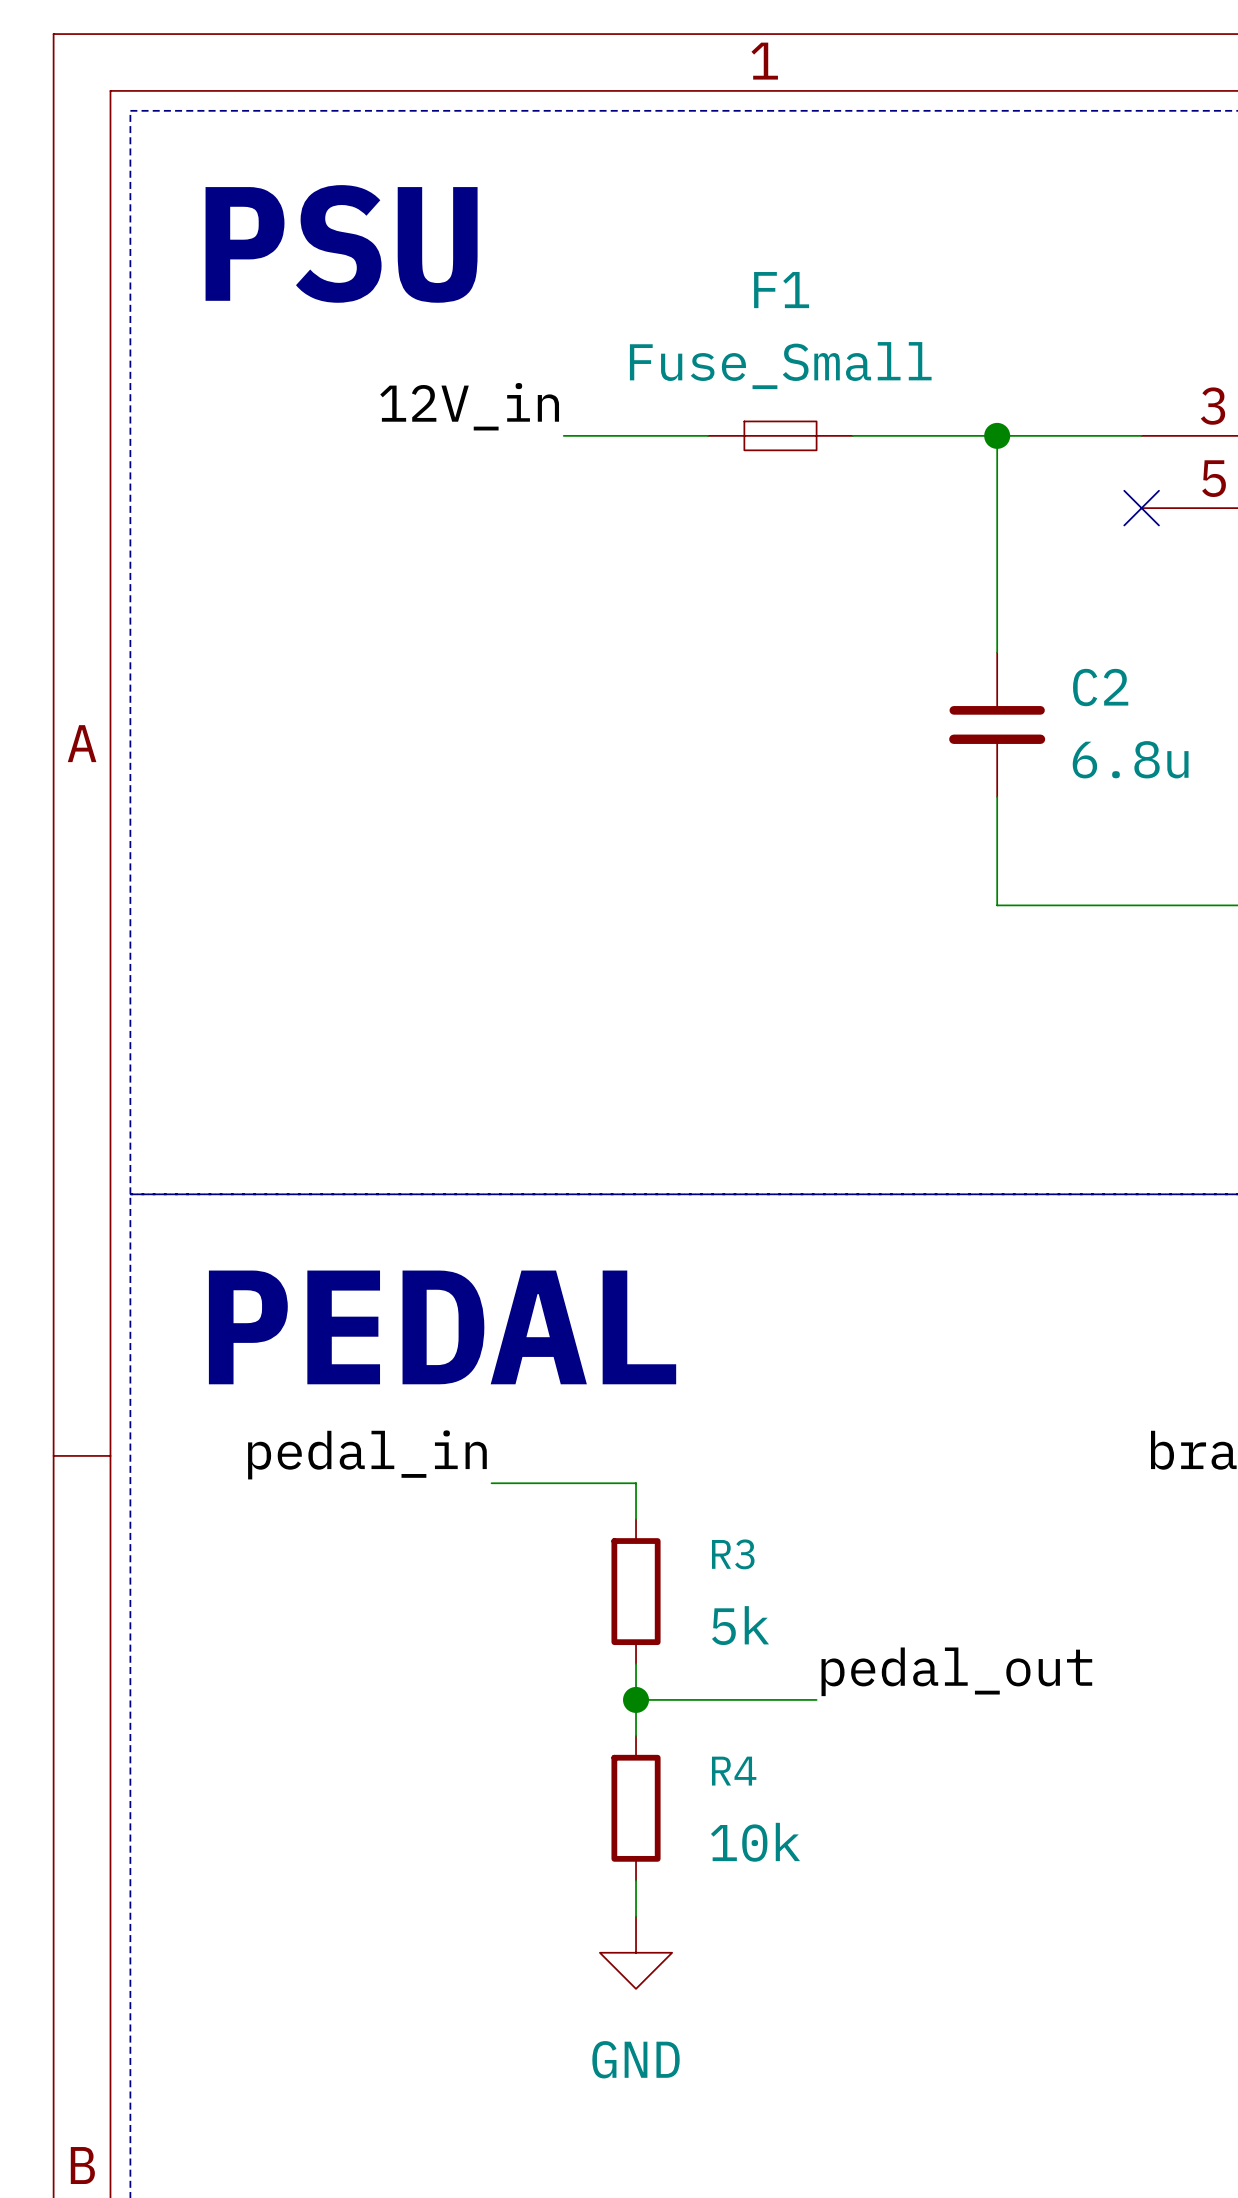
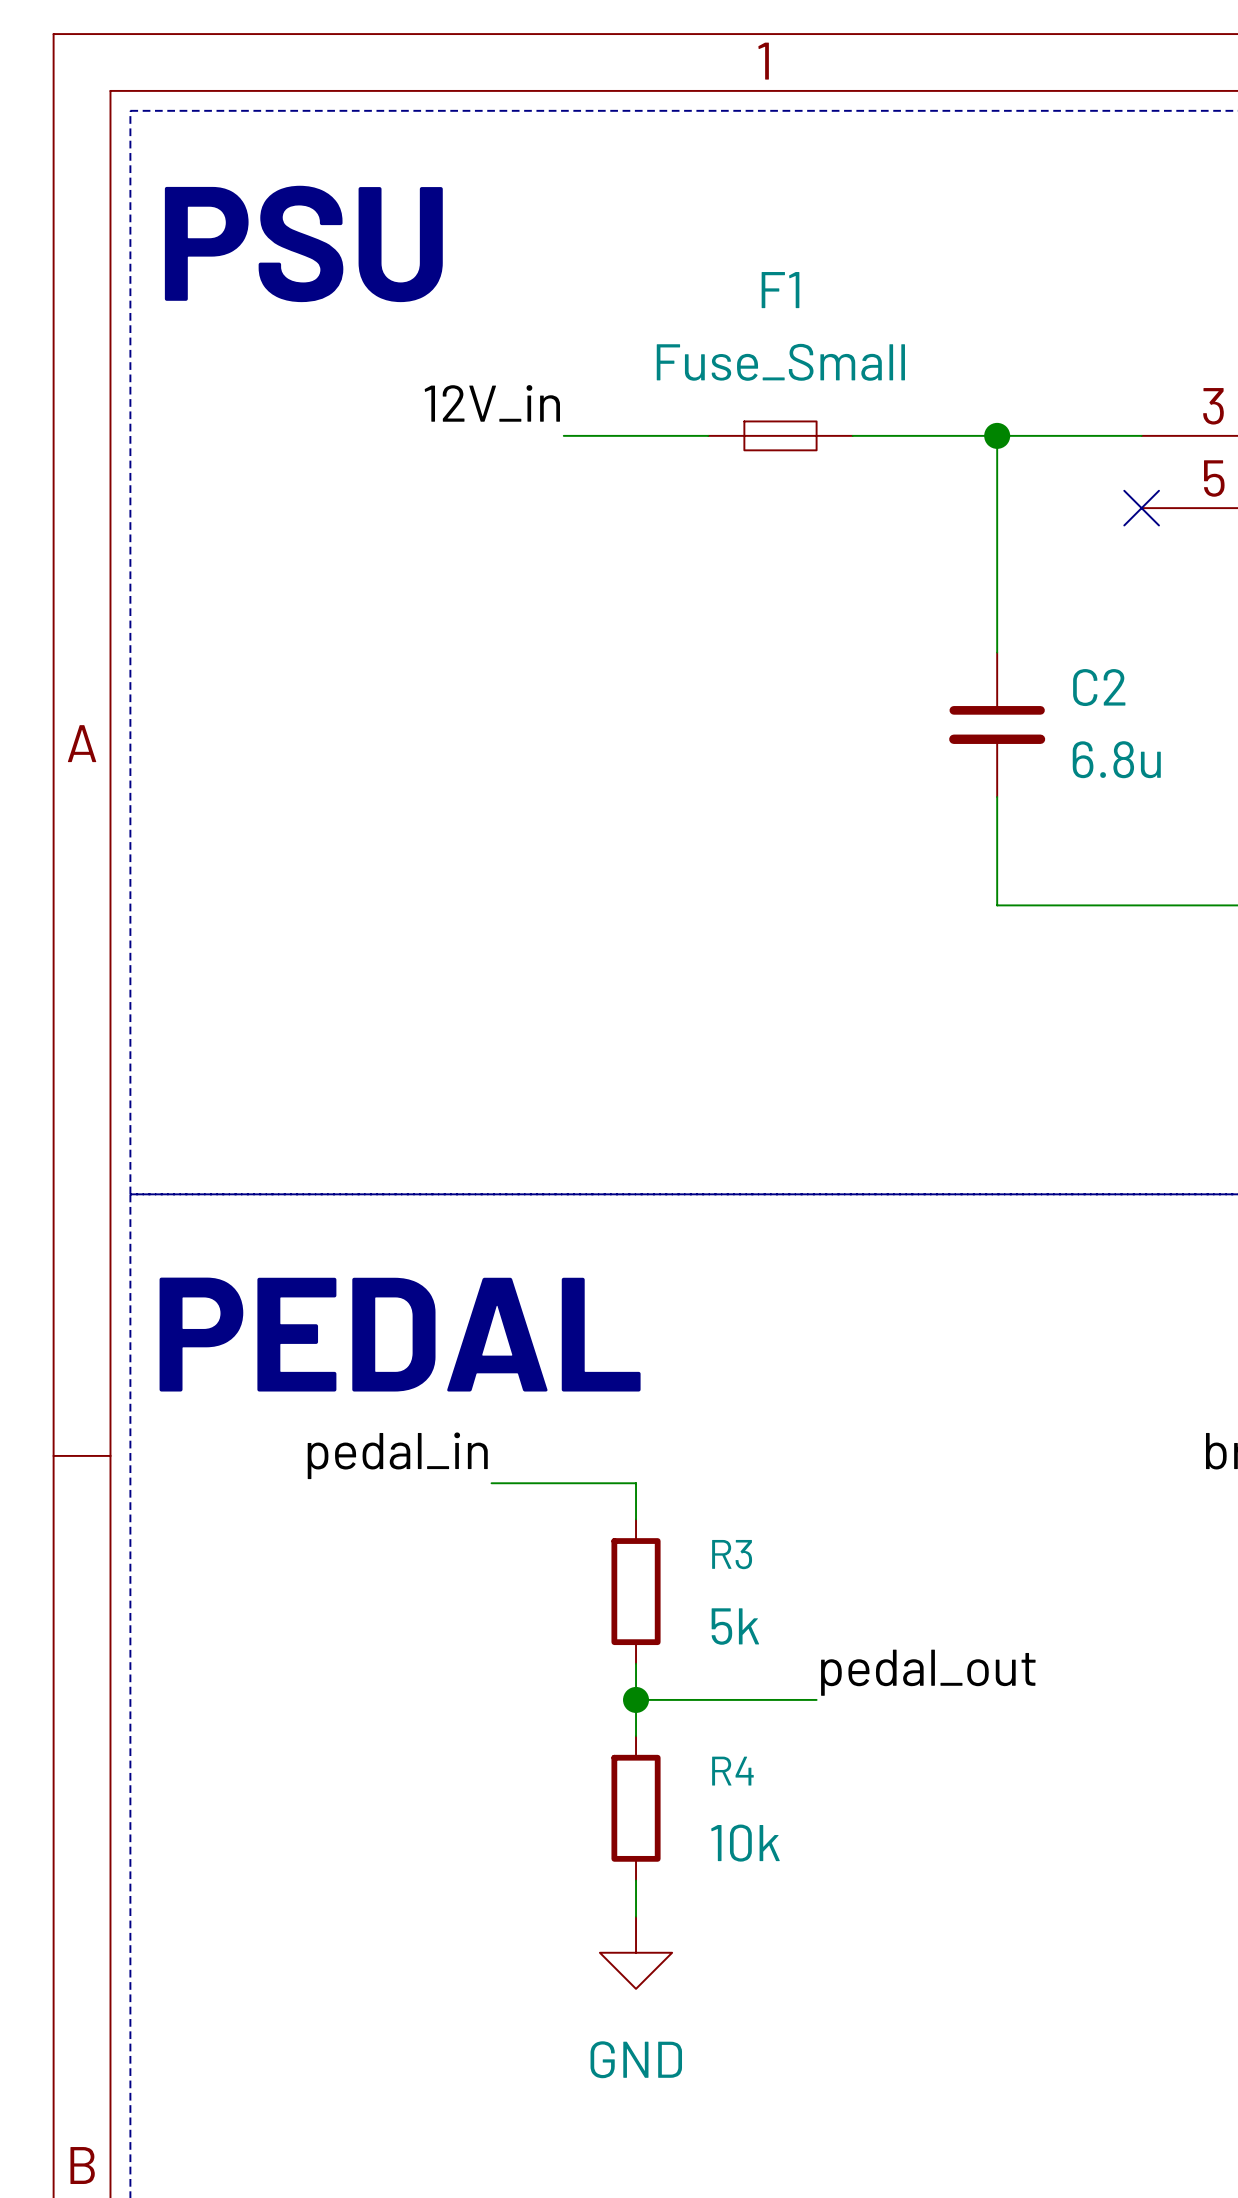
text position: PSU (341, 243) -> PSU (303, 243)
text position: PEDAL (442, 1327) -> PEDAL (400, 1334)

